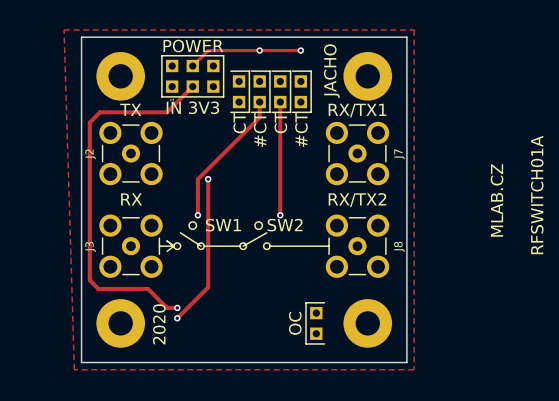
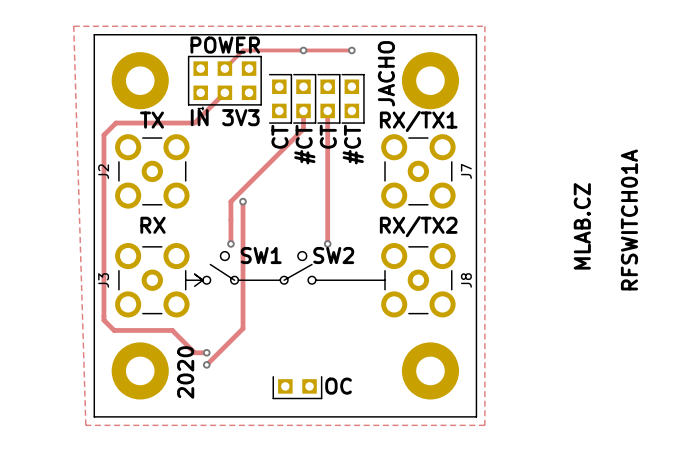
text rotation: 0° (295, 323) -> 90° clockwise (338, 386)
part rotation: 0° (315, 323) -> 90° counterclockwise (297, 387)
part position: (315, 323) -> (297, 387)

